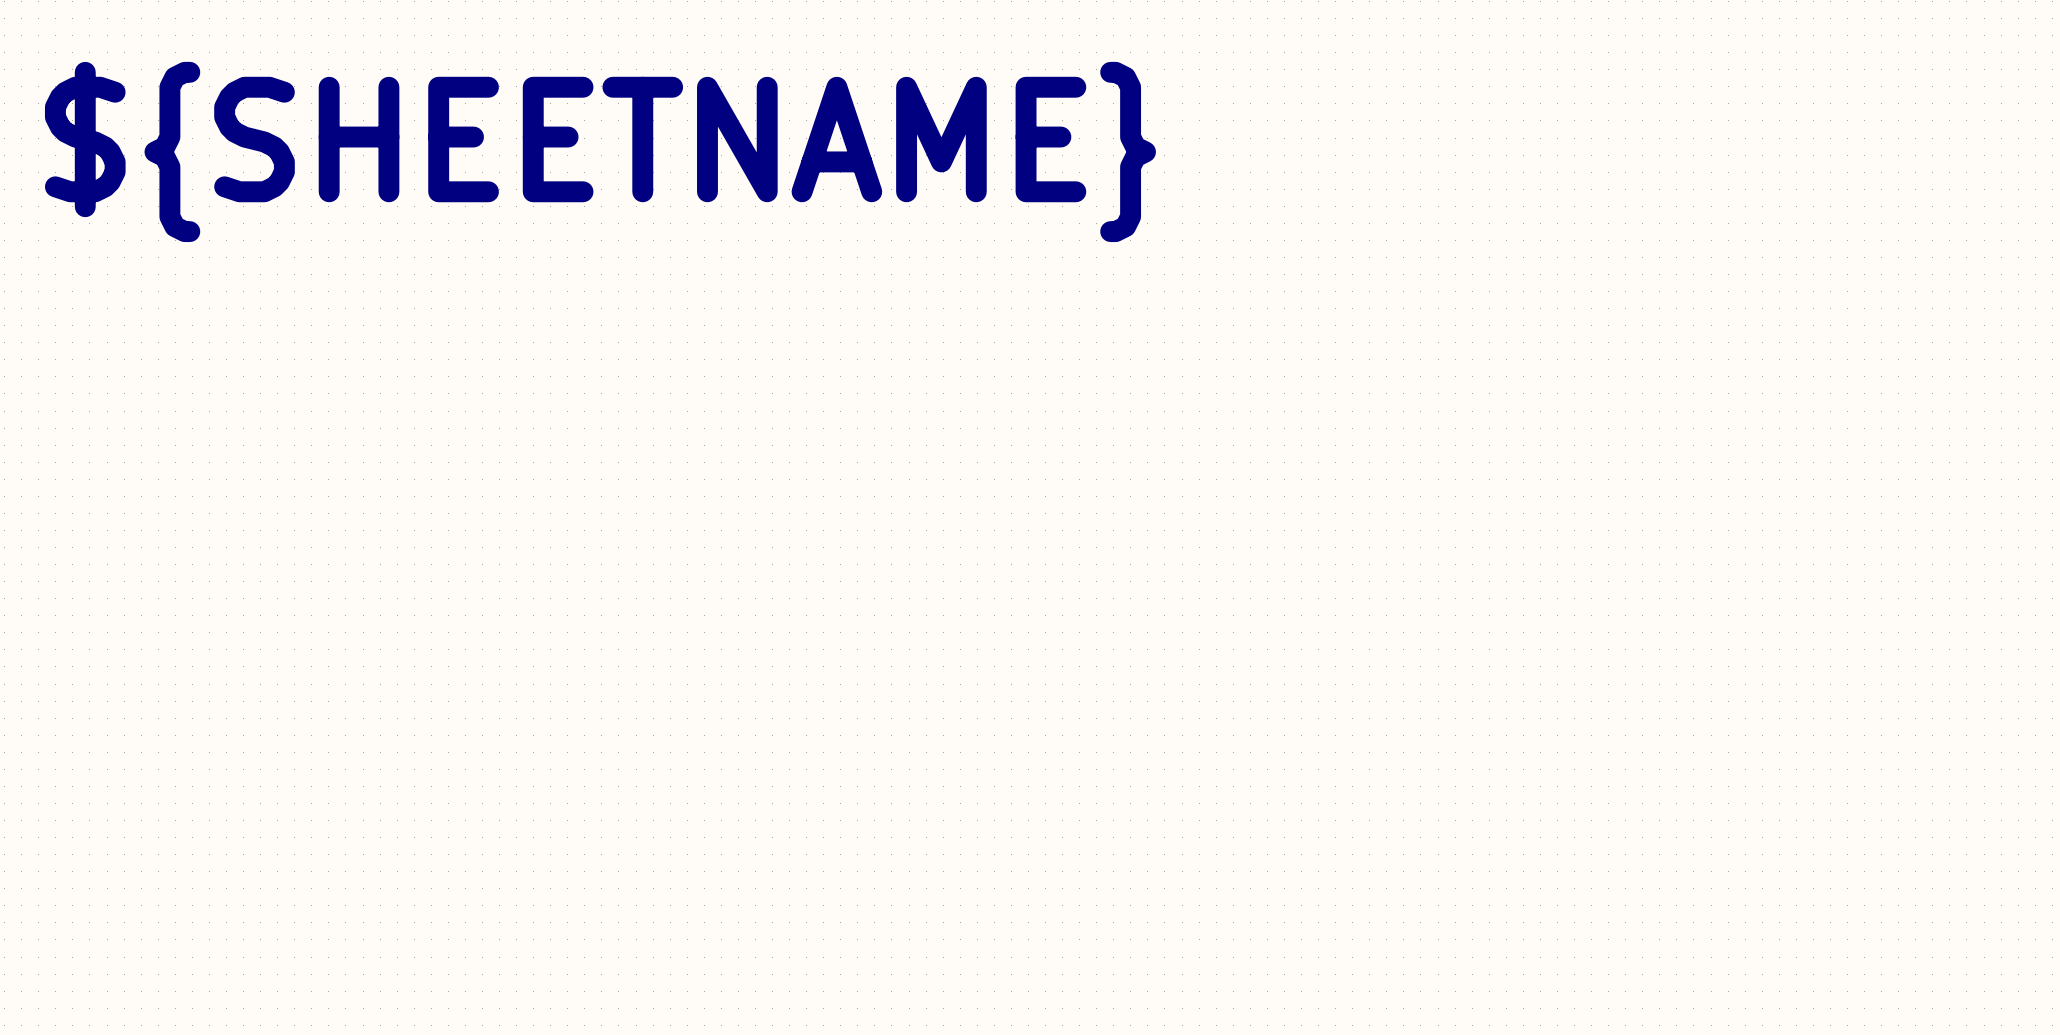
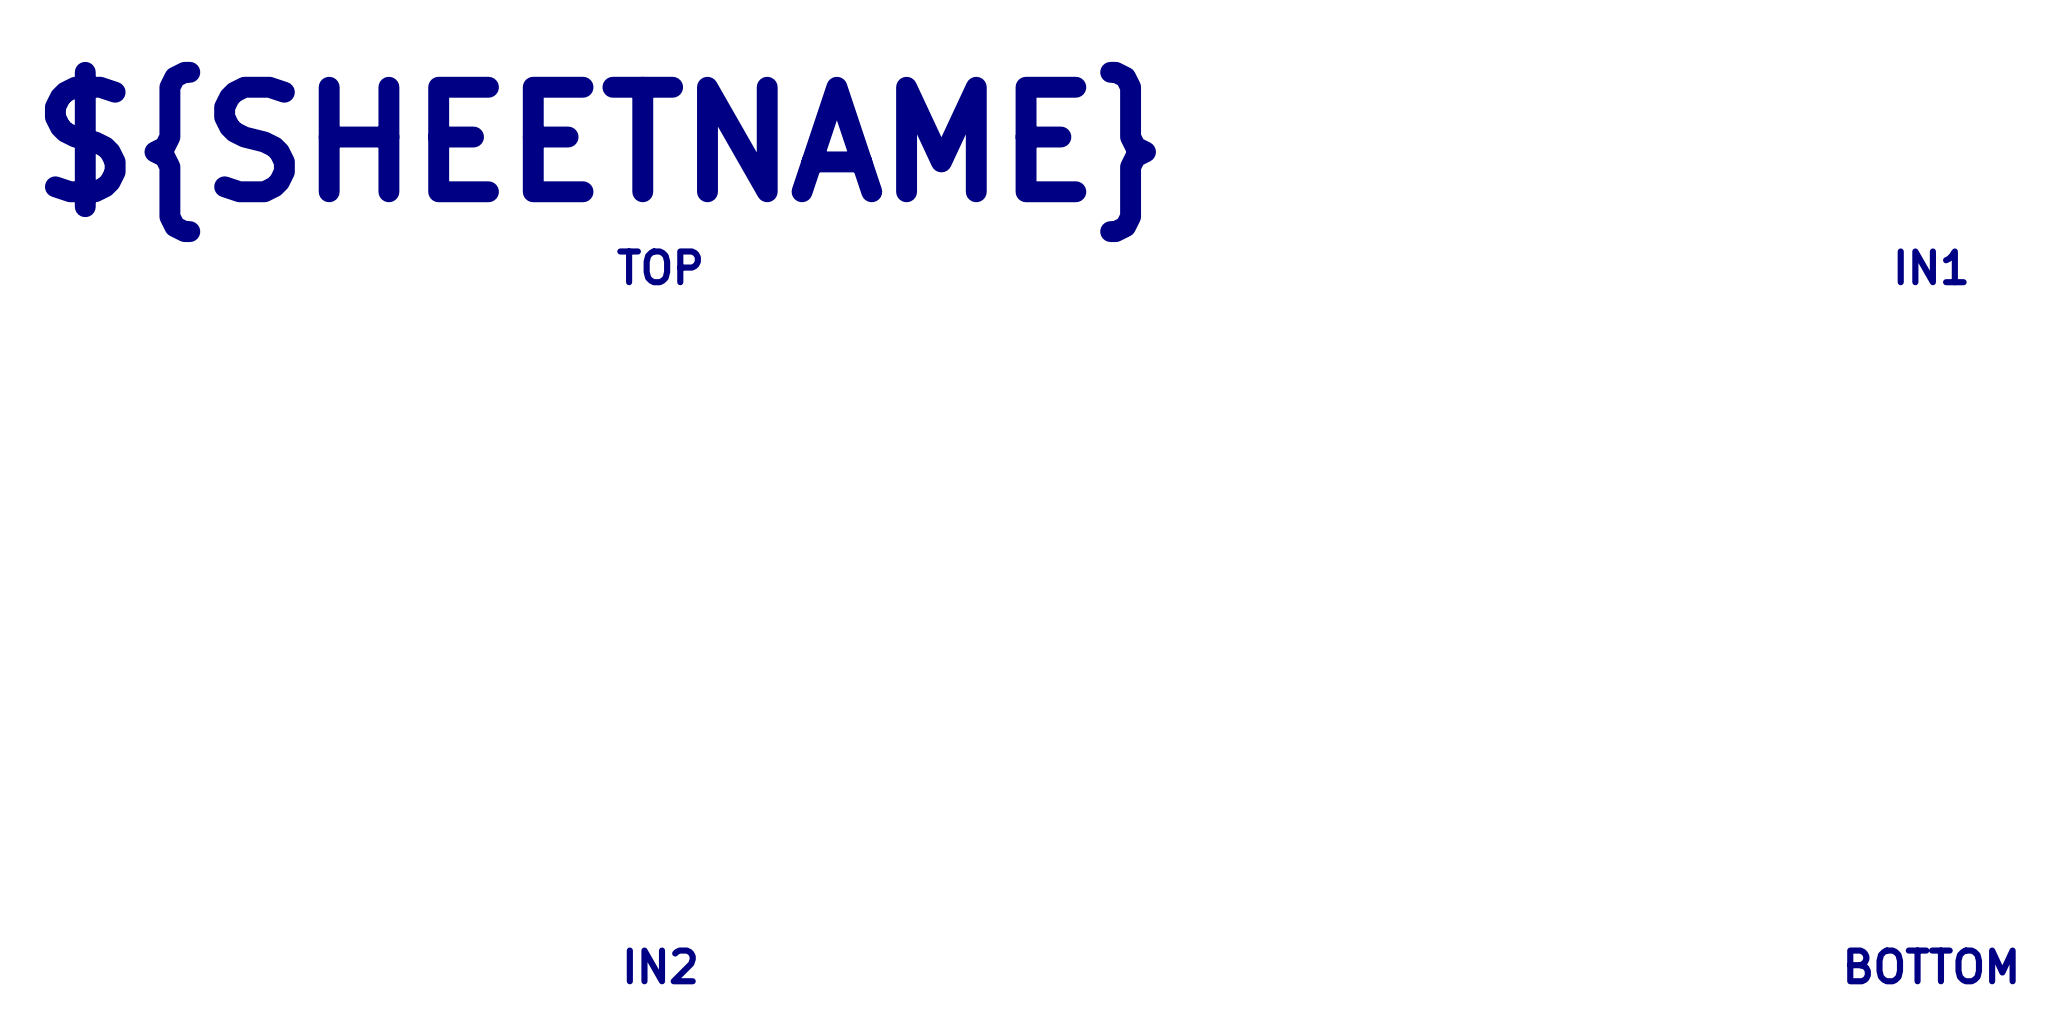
text: none -> TOP (659, 266)
text: none -> IN1 (1932, 266)
text: none -> IN2 (661, 965)
text: none -> BOTTOM (1931, 965)

